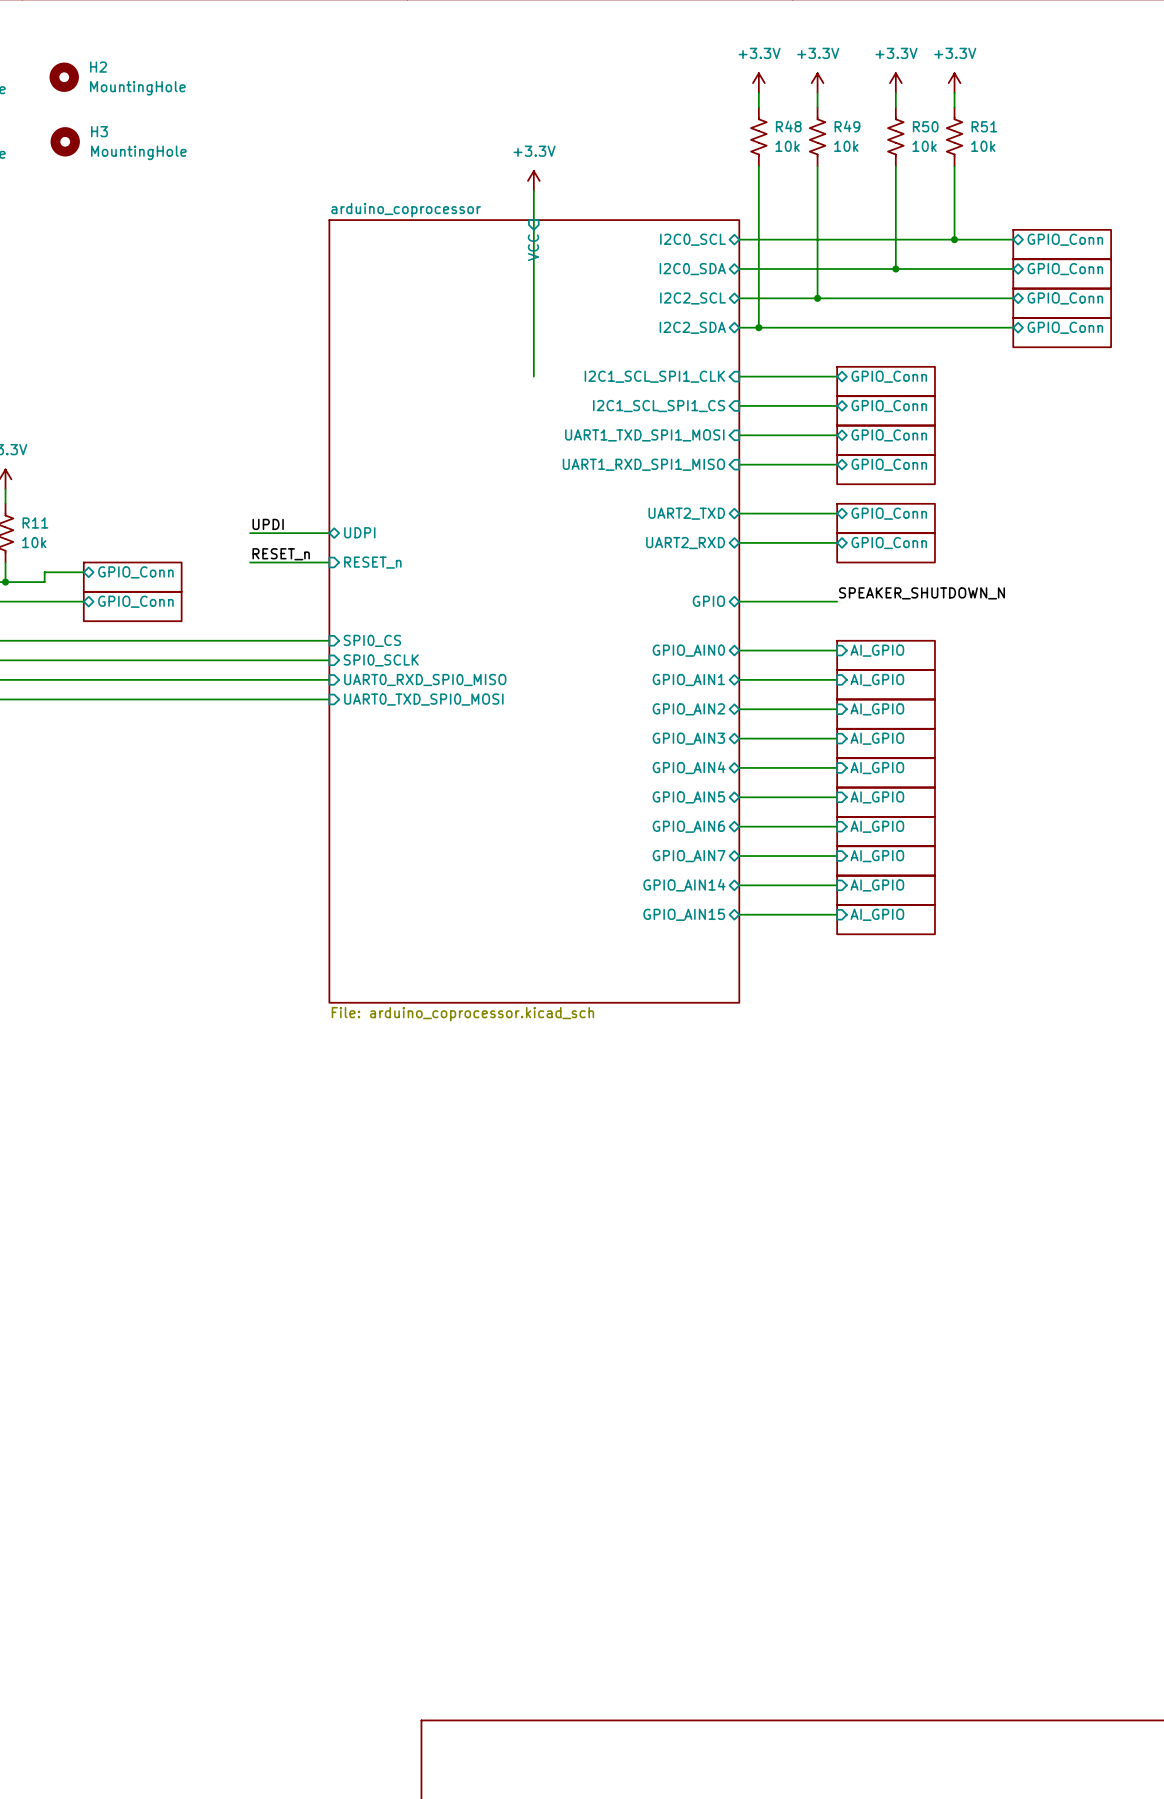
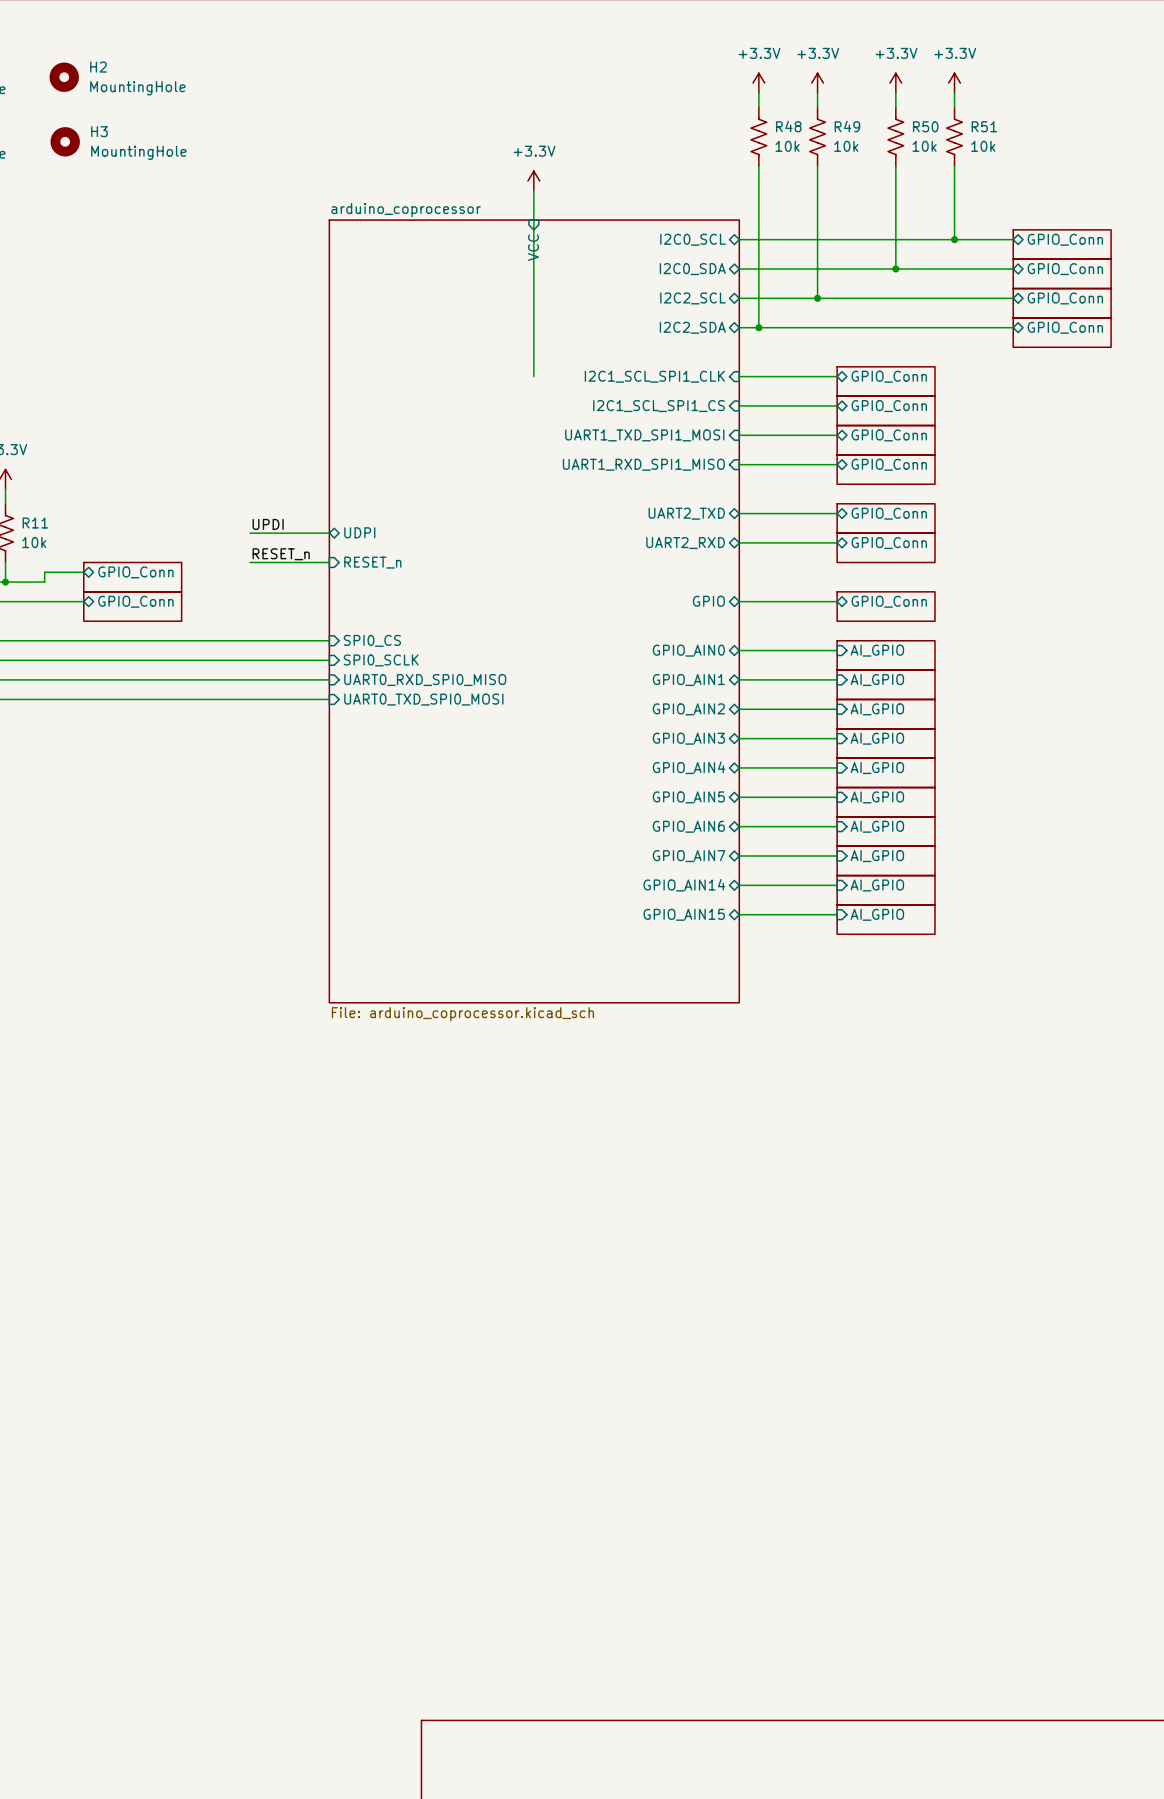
label: SPEAKER_SHUTDOWN_N (922, 593) -> none
sheet pin: none -> GPIO_Conn (889, 601)
sheet: none -> (886, 606)

